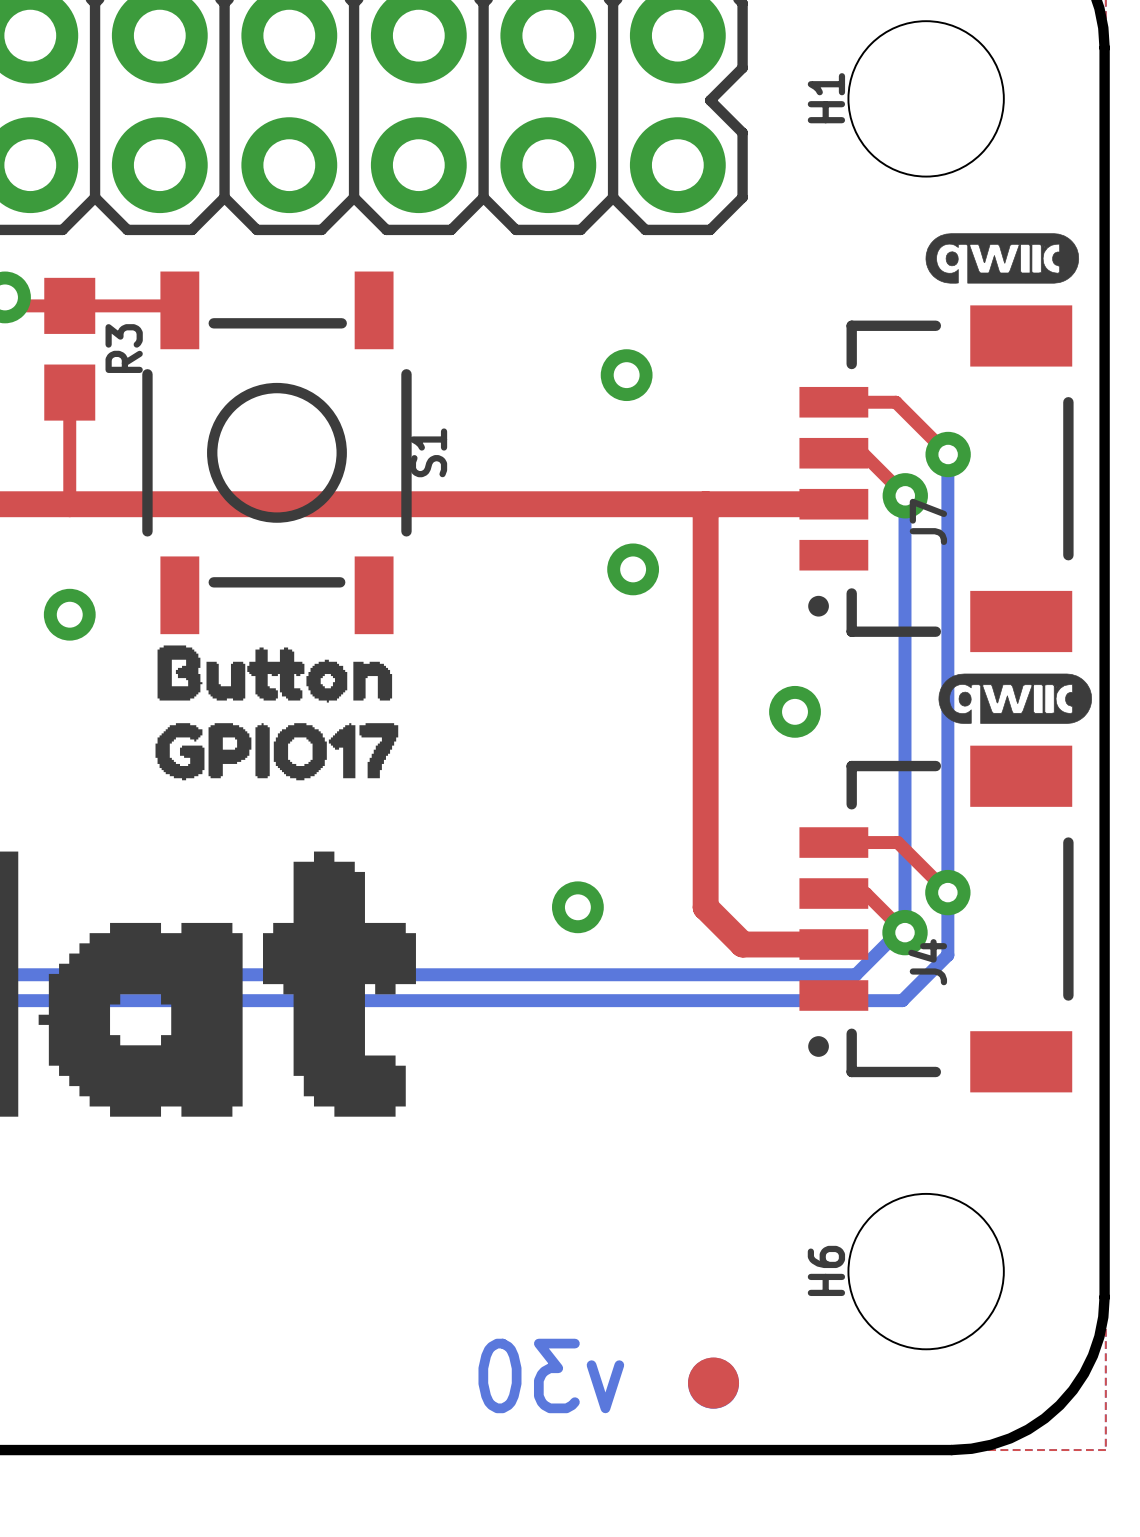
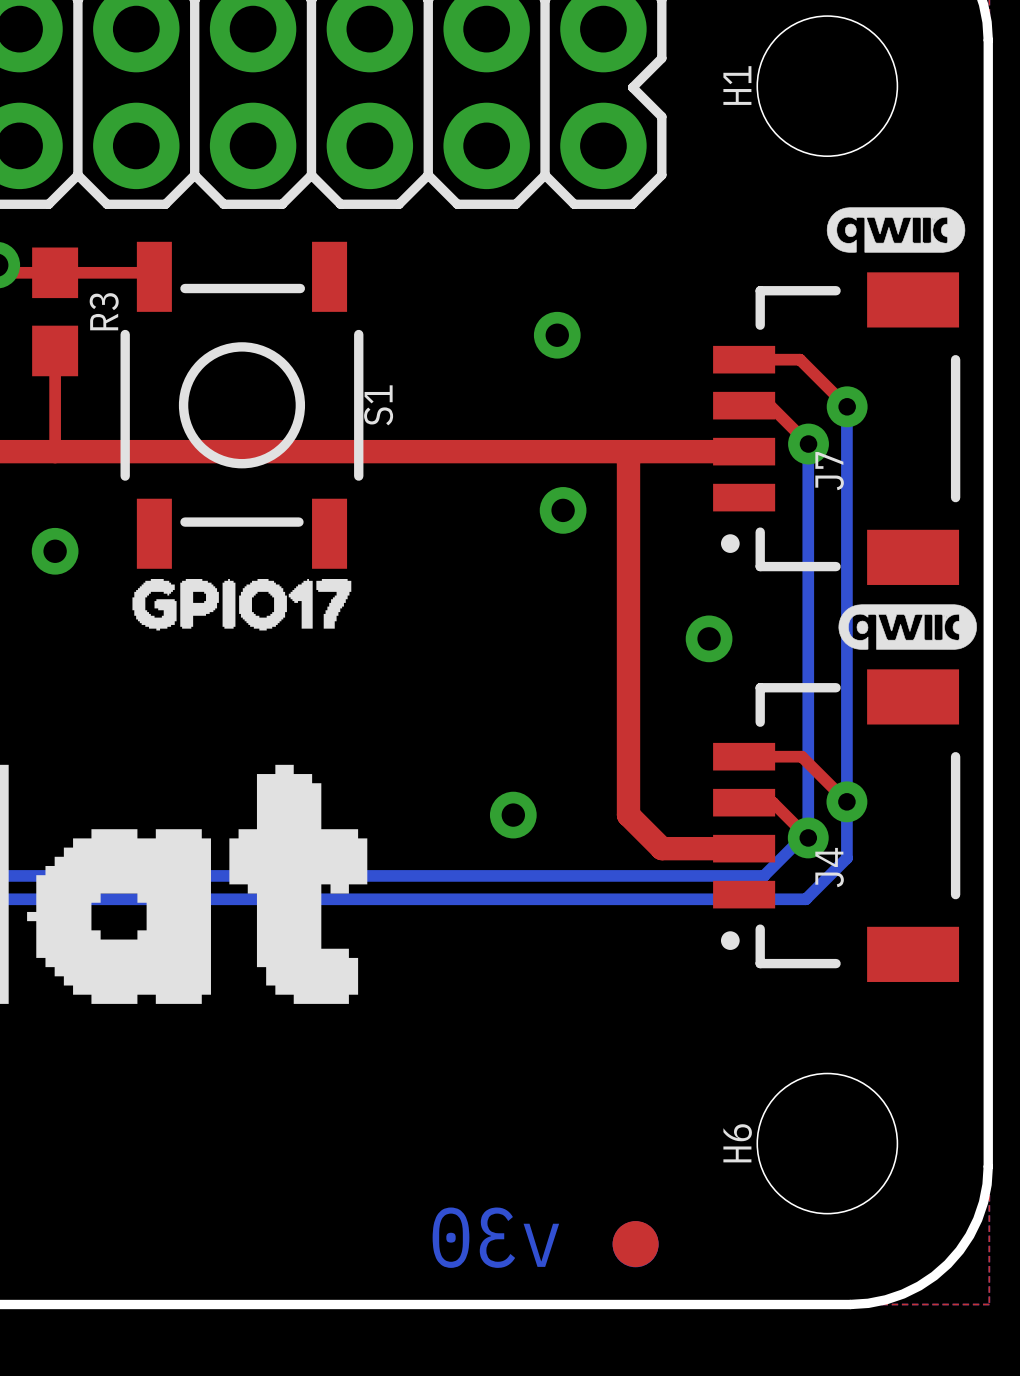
drawing: [157, 645, 393, 703] -> none
drawing position: (276, 751) -> (241, 604)

